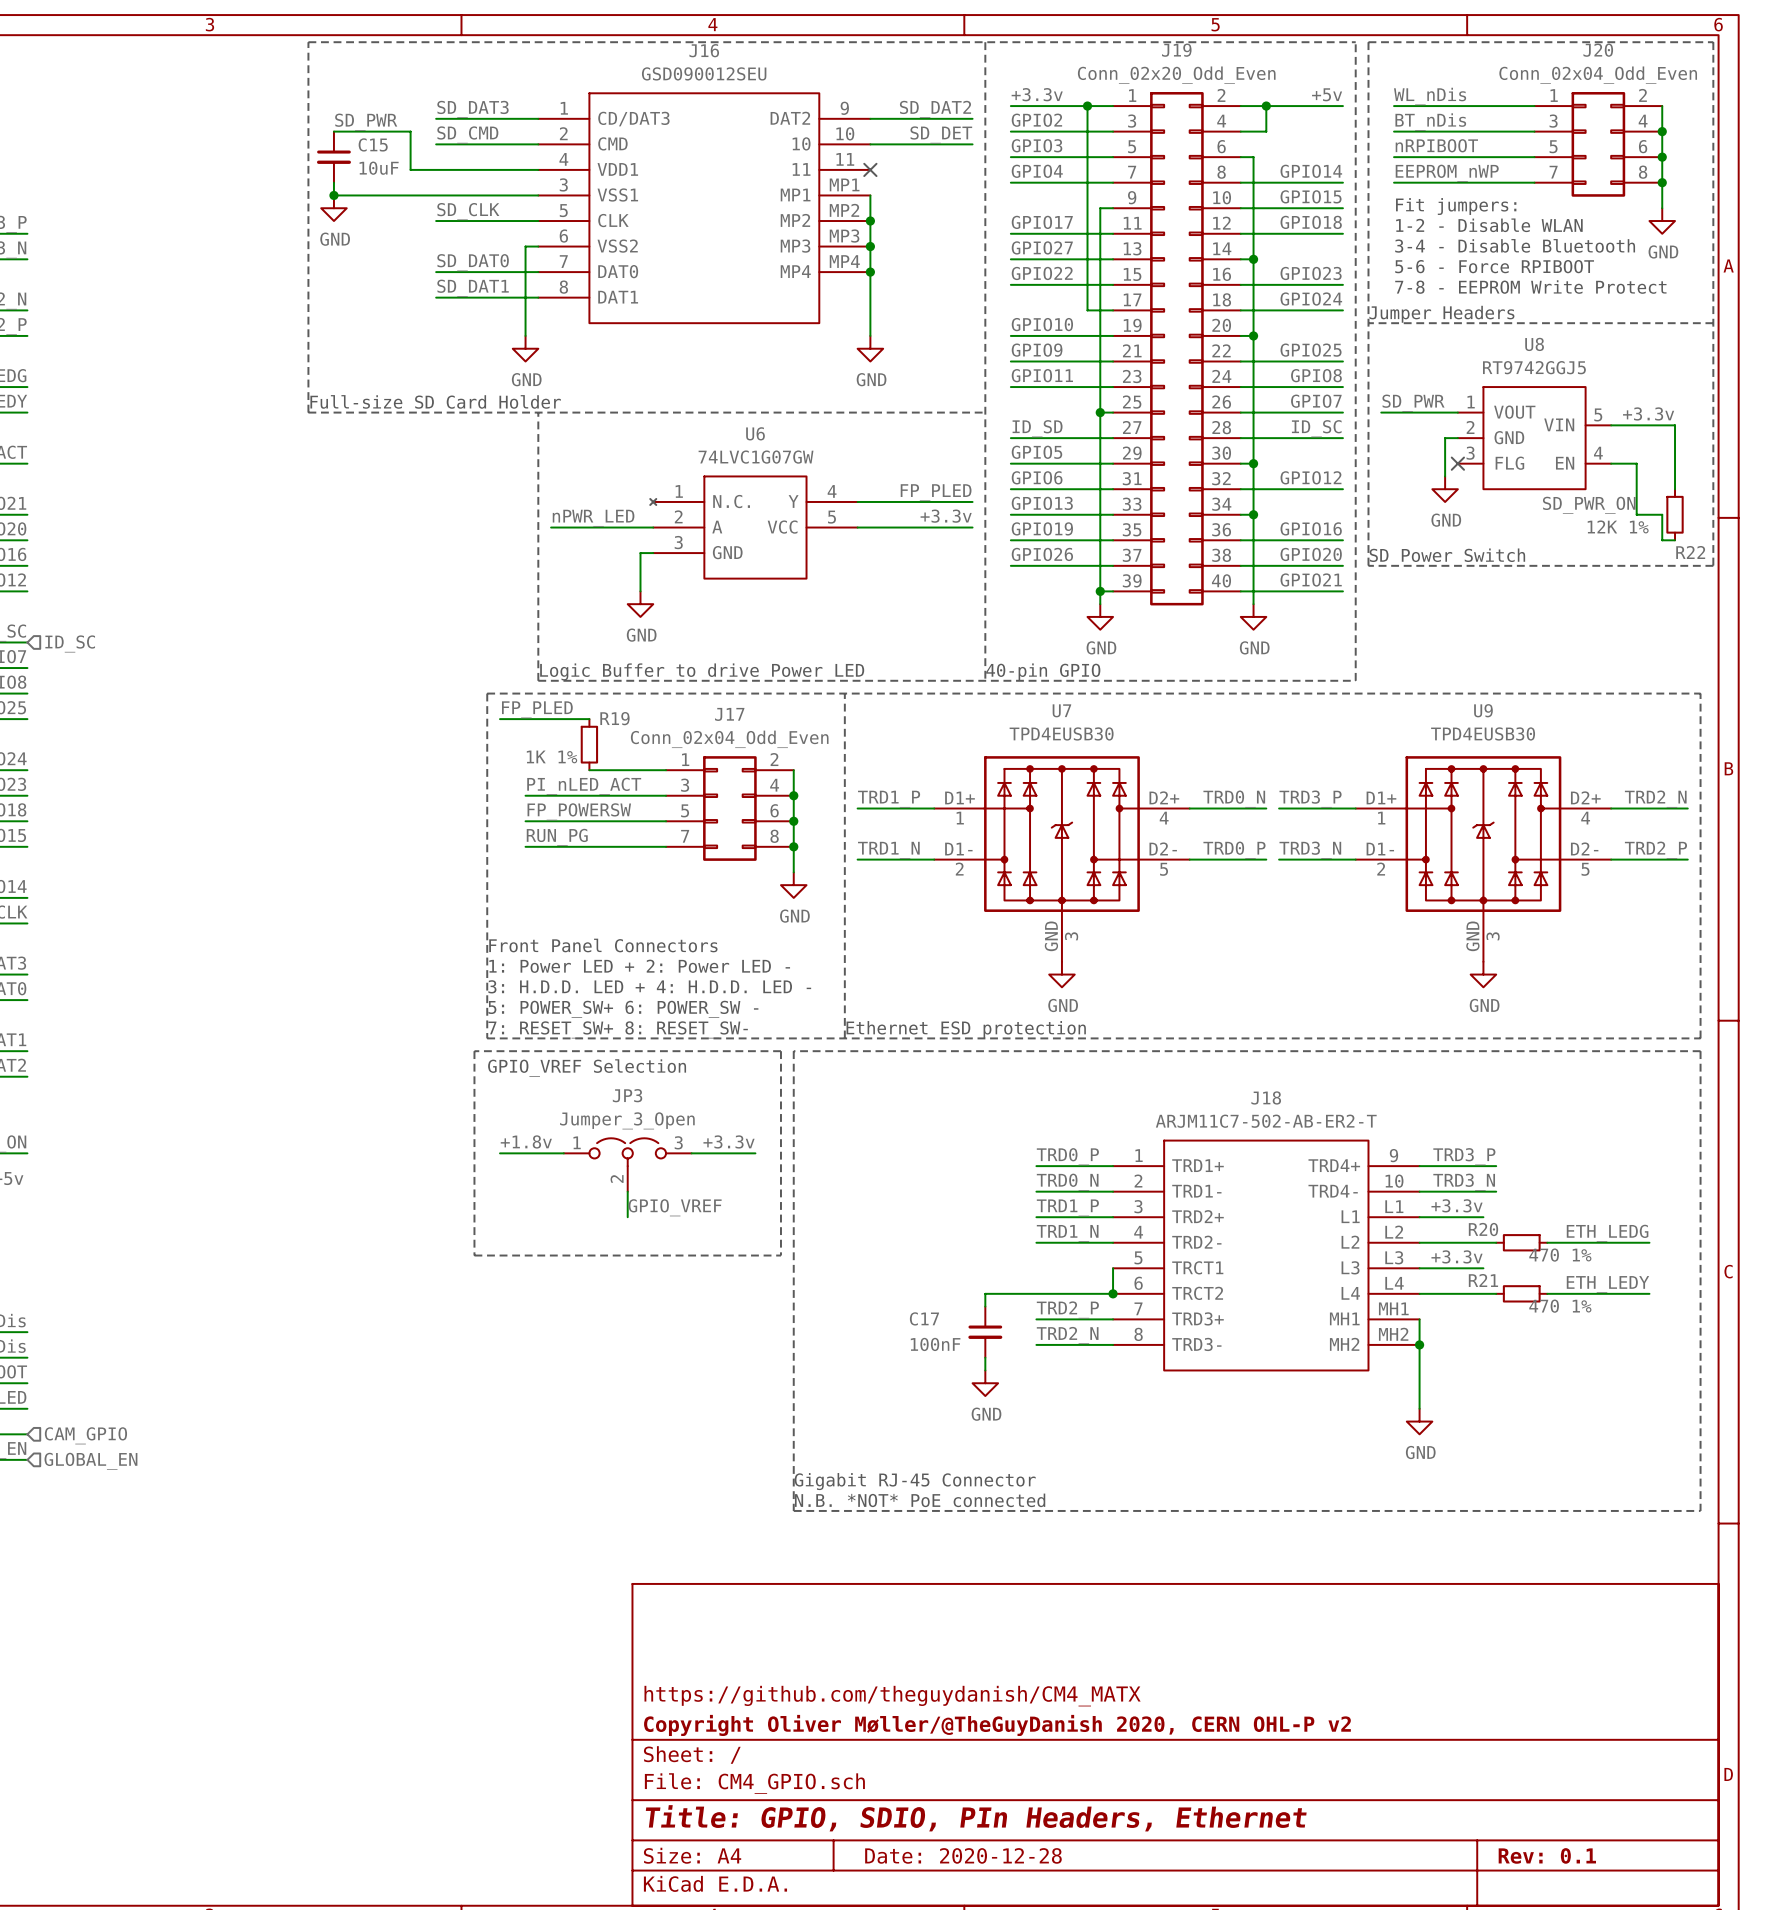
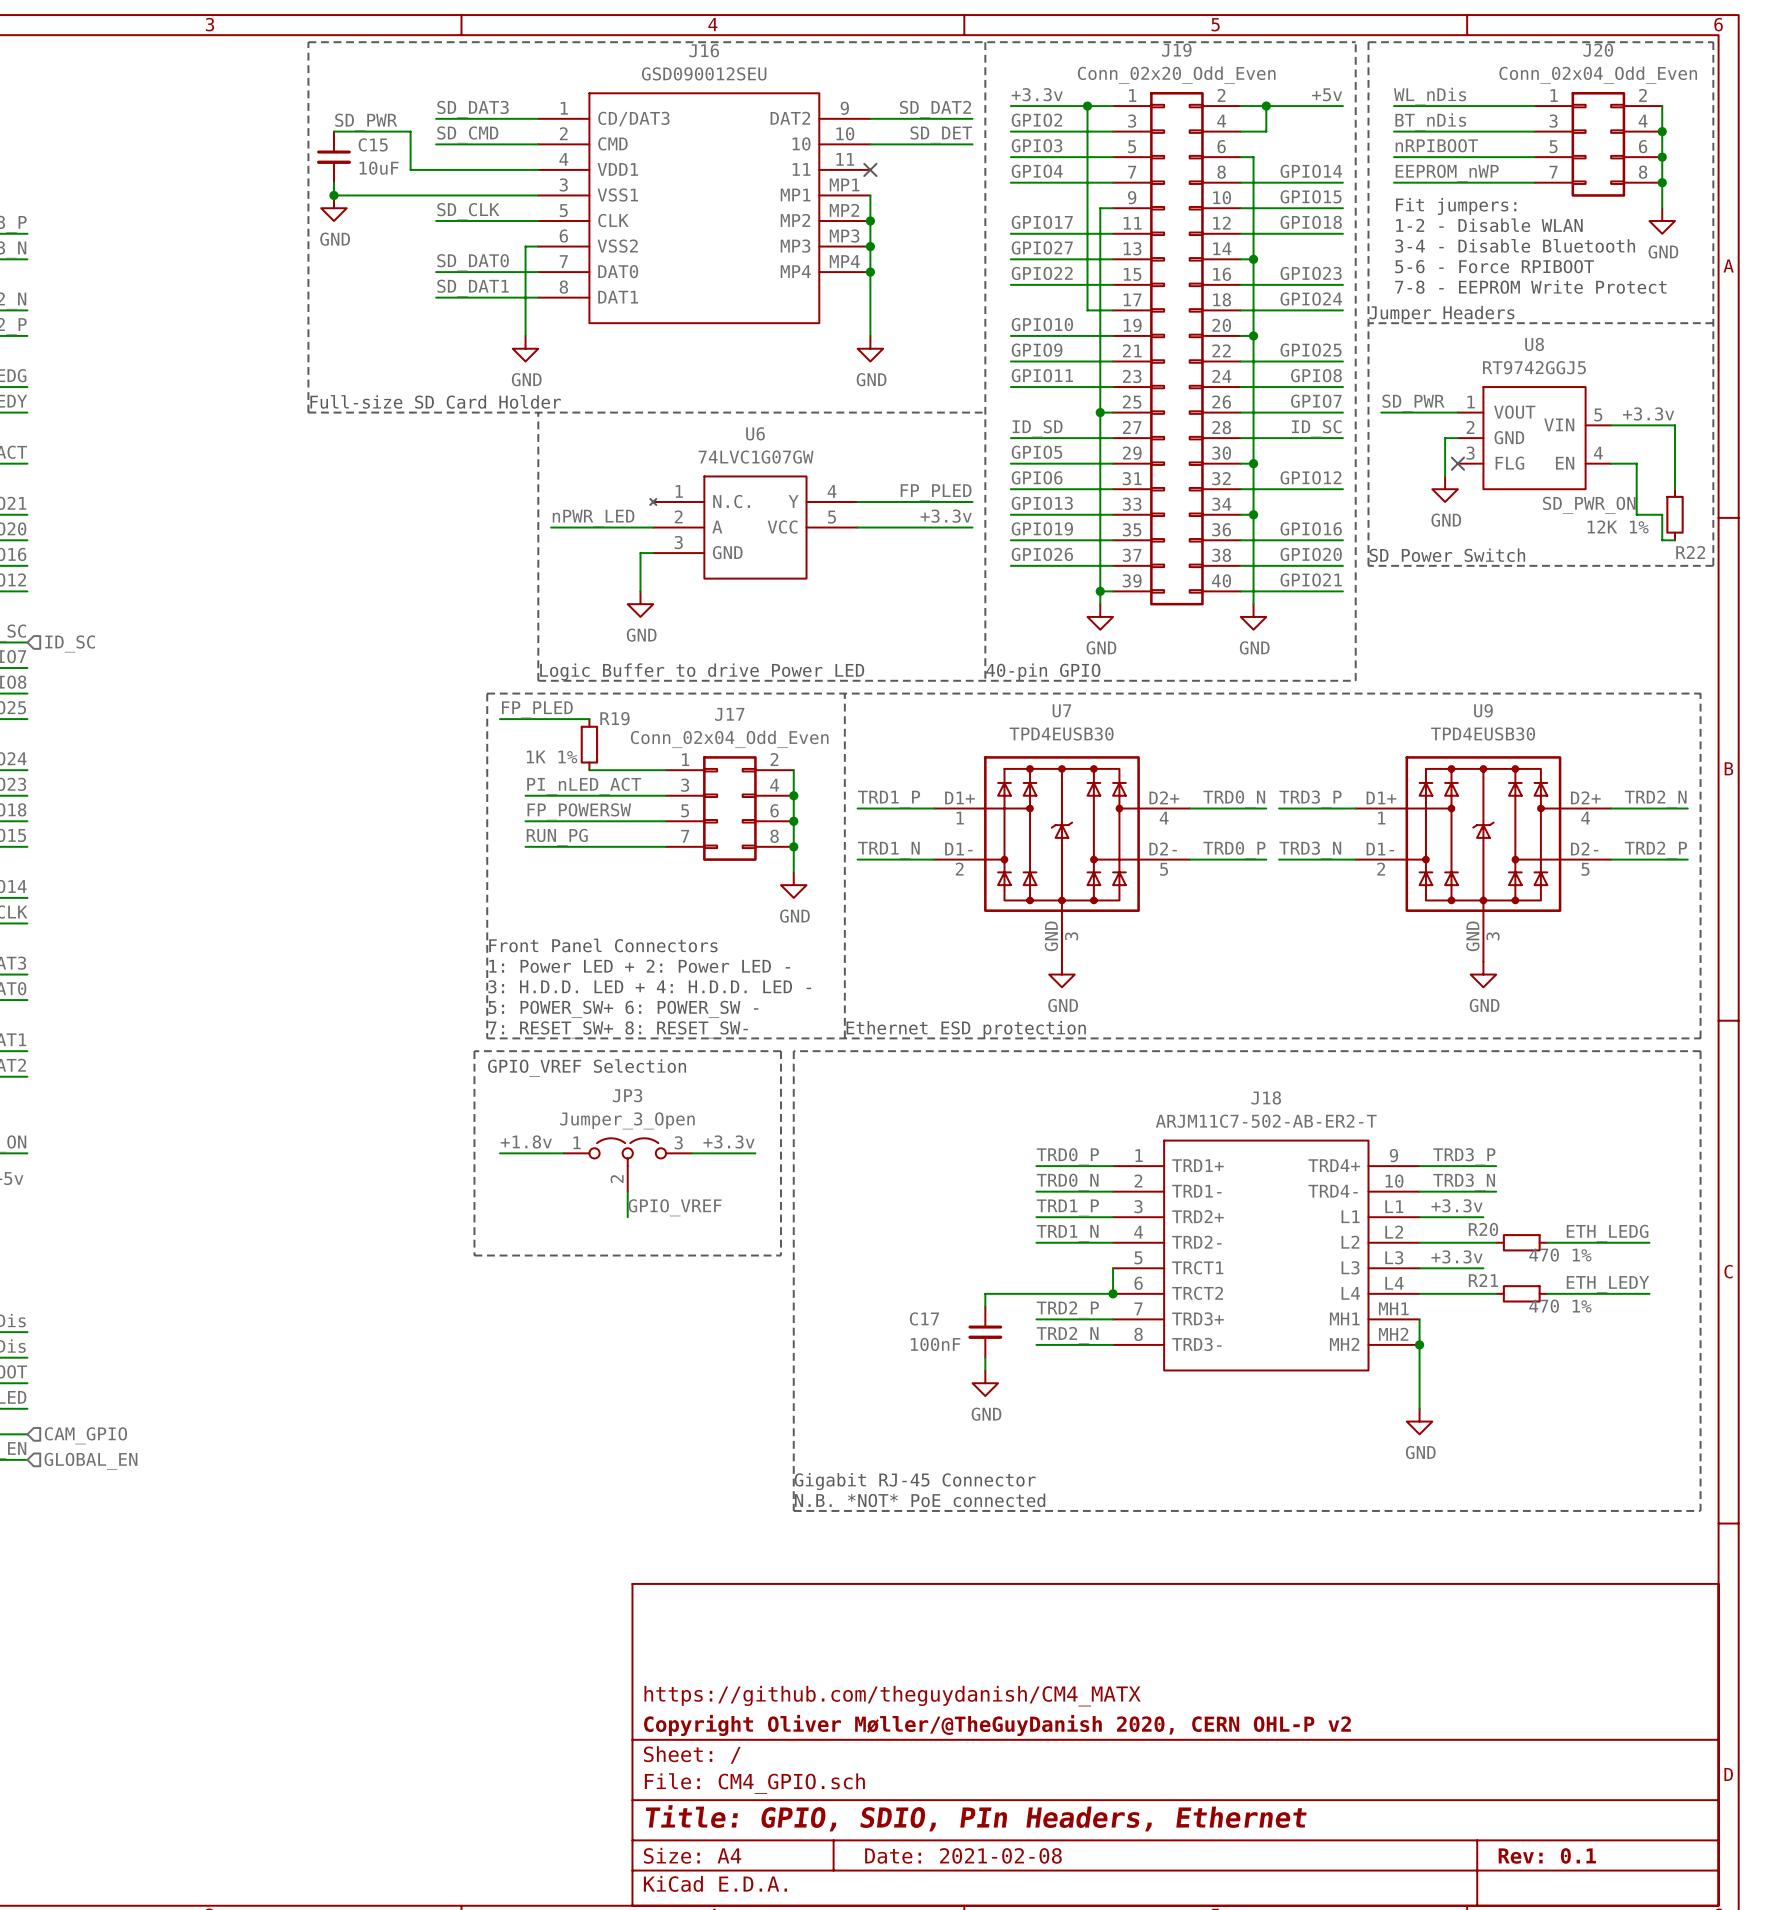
title block: Date: 2020-12-28 (963, 1855) -> Date: 2021-02-08 (963, 1855)

